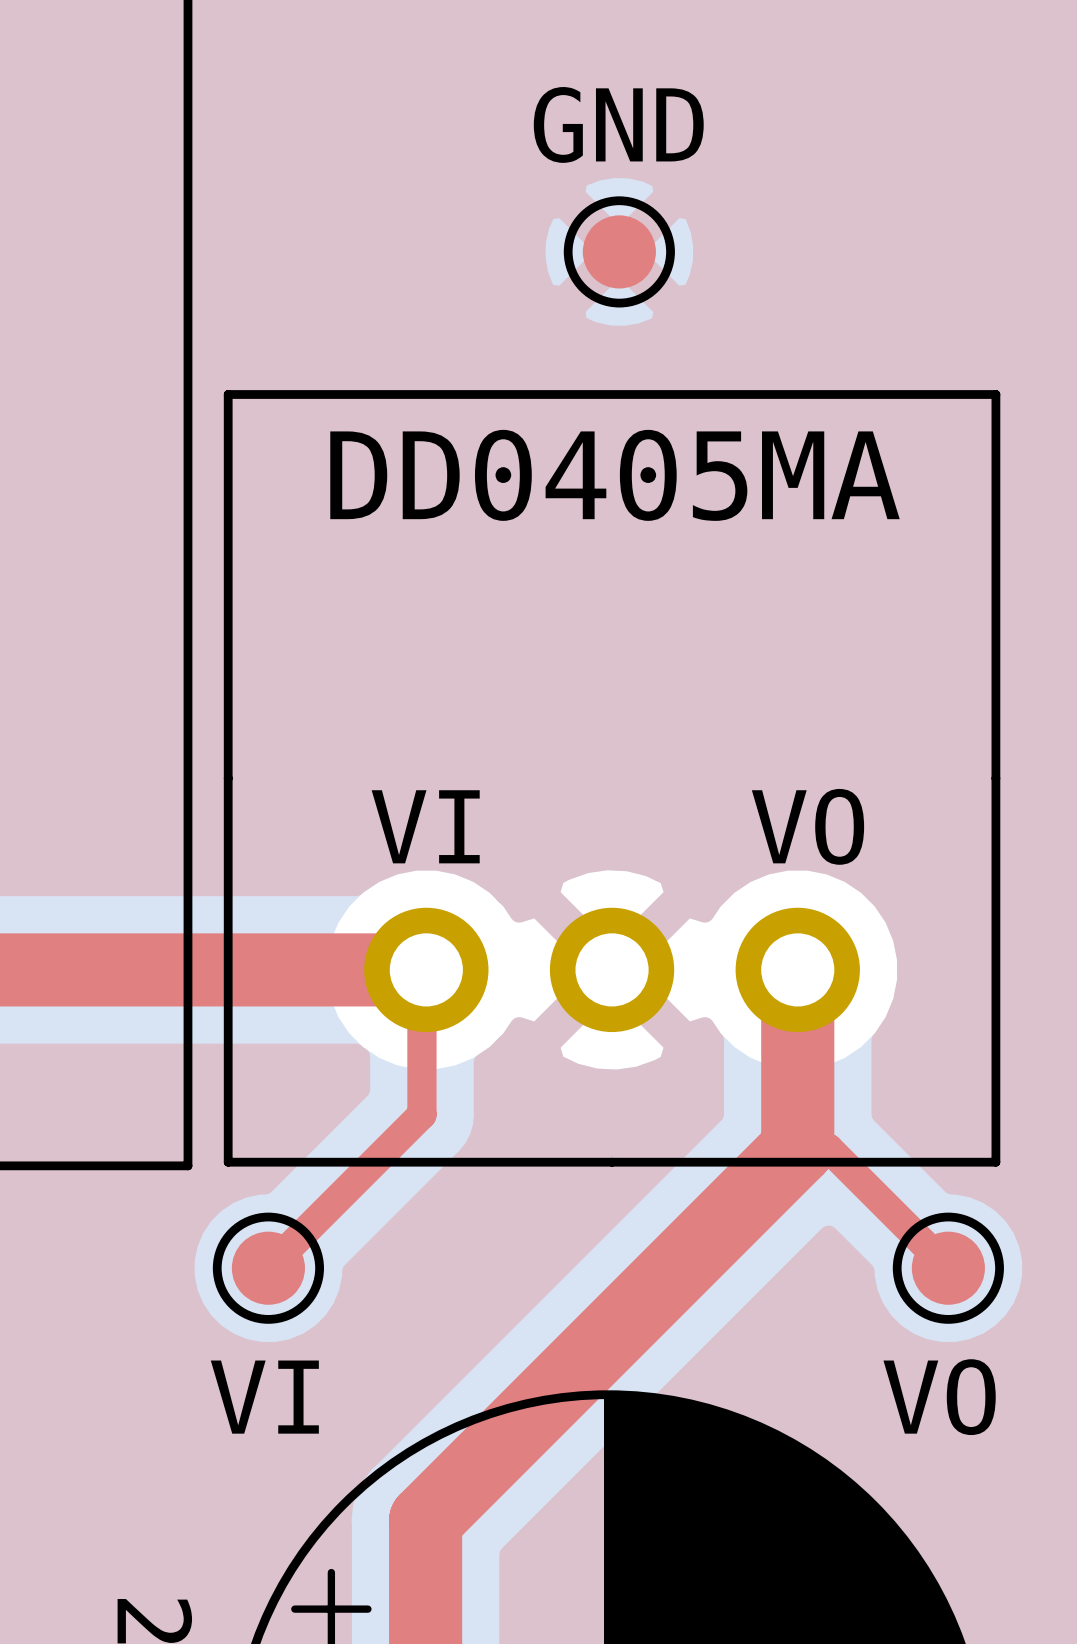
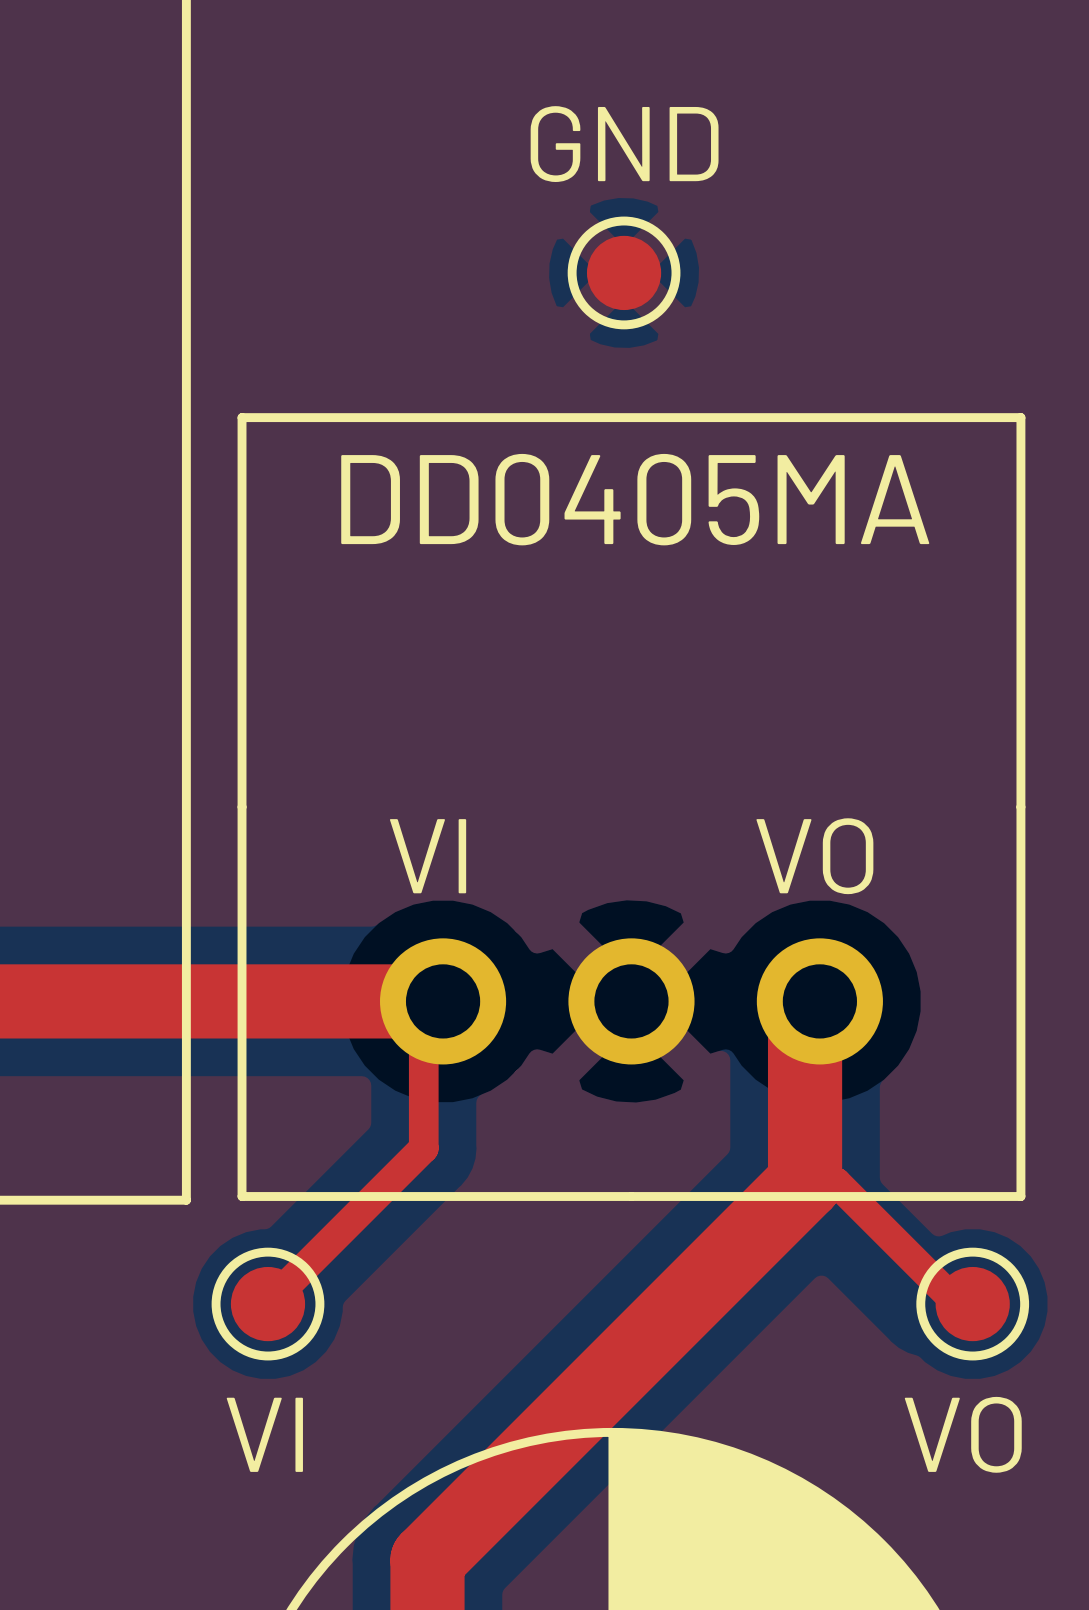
part position: (612, 778) -> (631, 807)
part position: (948, 1268) -> (972, 1304)
text position: VO (939, 1397) -> VO (963, 1434)

